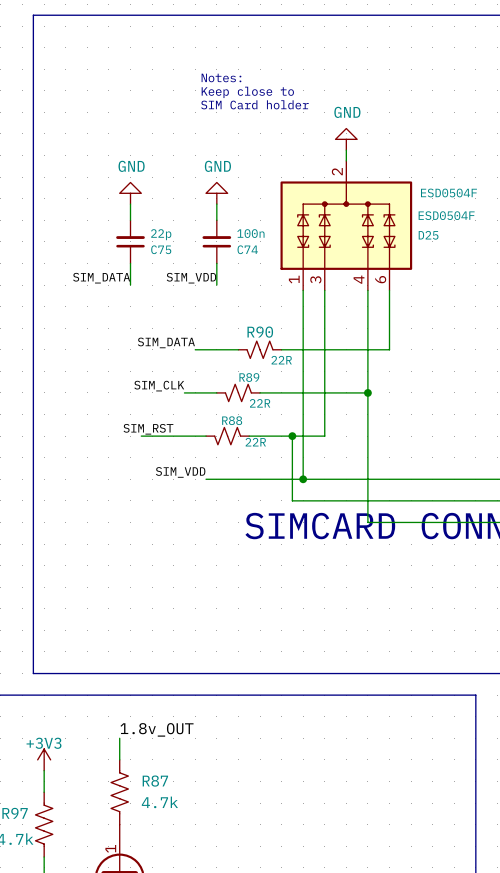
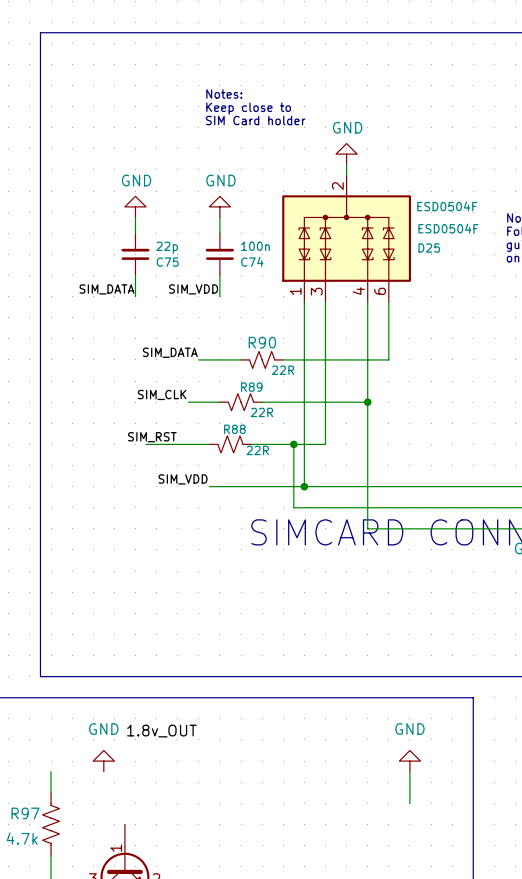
wire: (119, 738) (119, 759) -> none
power symbol: +3V3 (44, 759) -> none
power symbol: none -> GND (103, 761)
power symbol: none -> GND (409, 761)
wire: none -> (409, 771) (409, 803)
R87: 4.7k (119, 792) -> none

